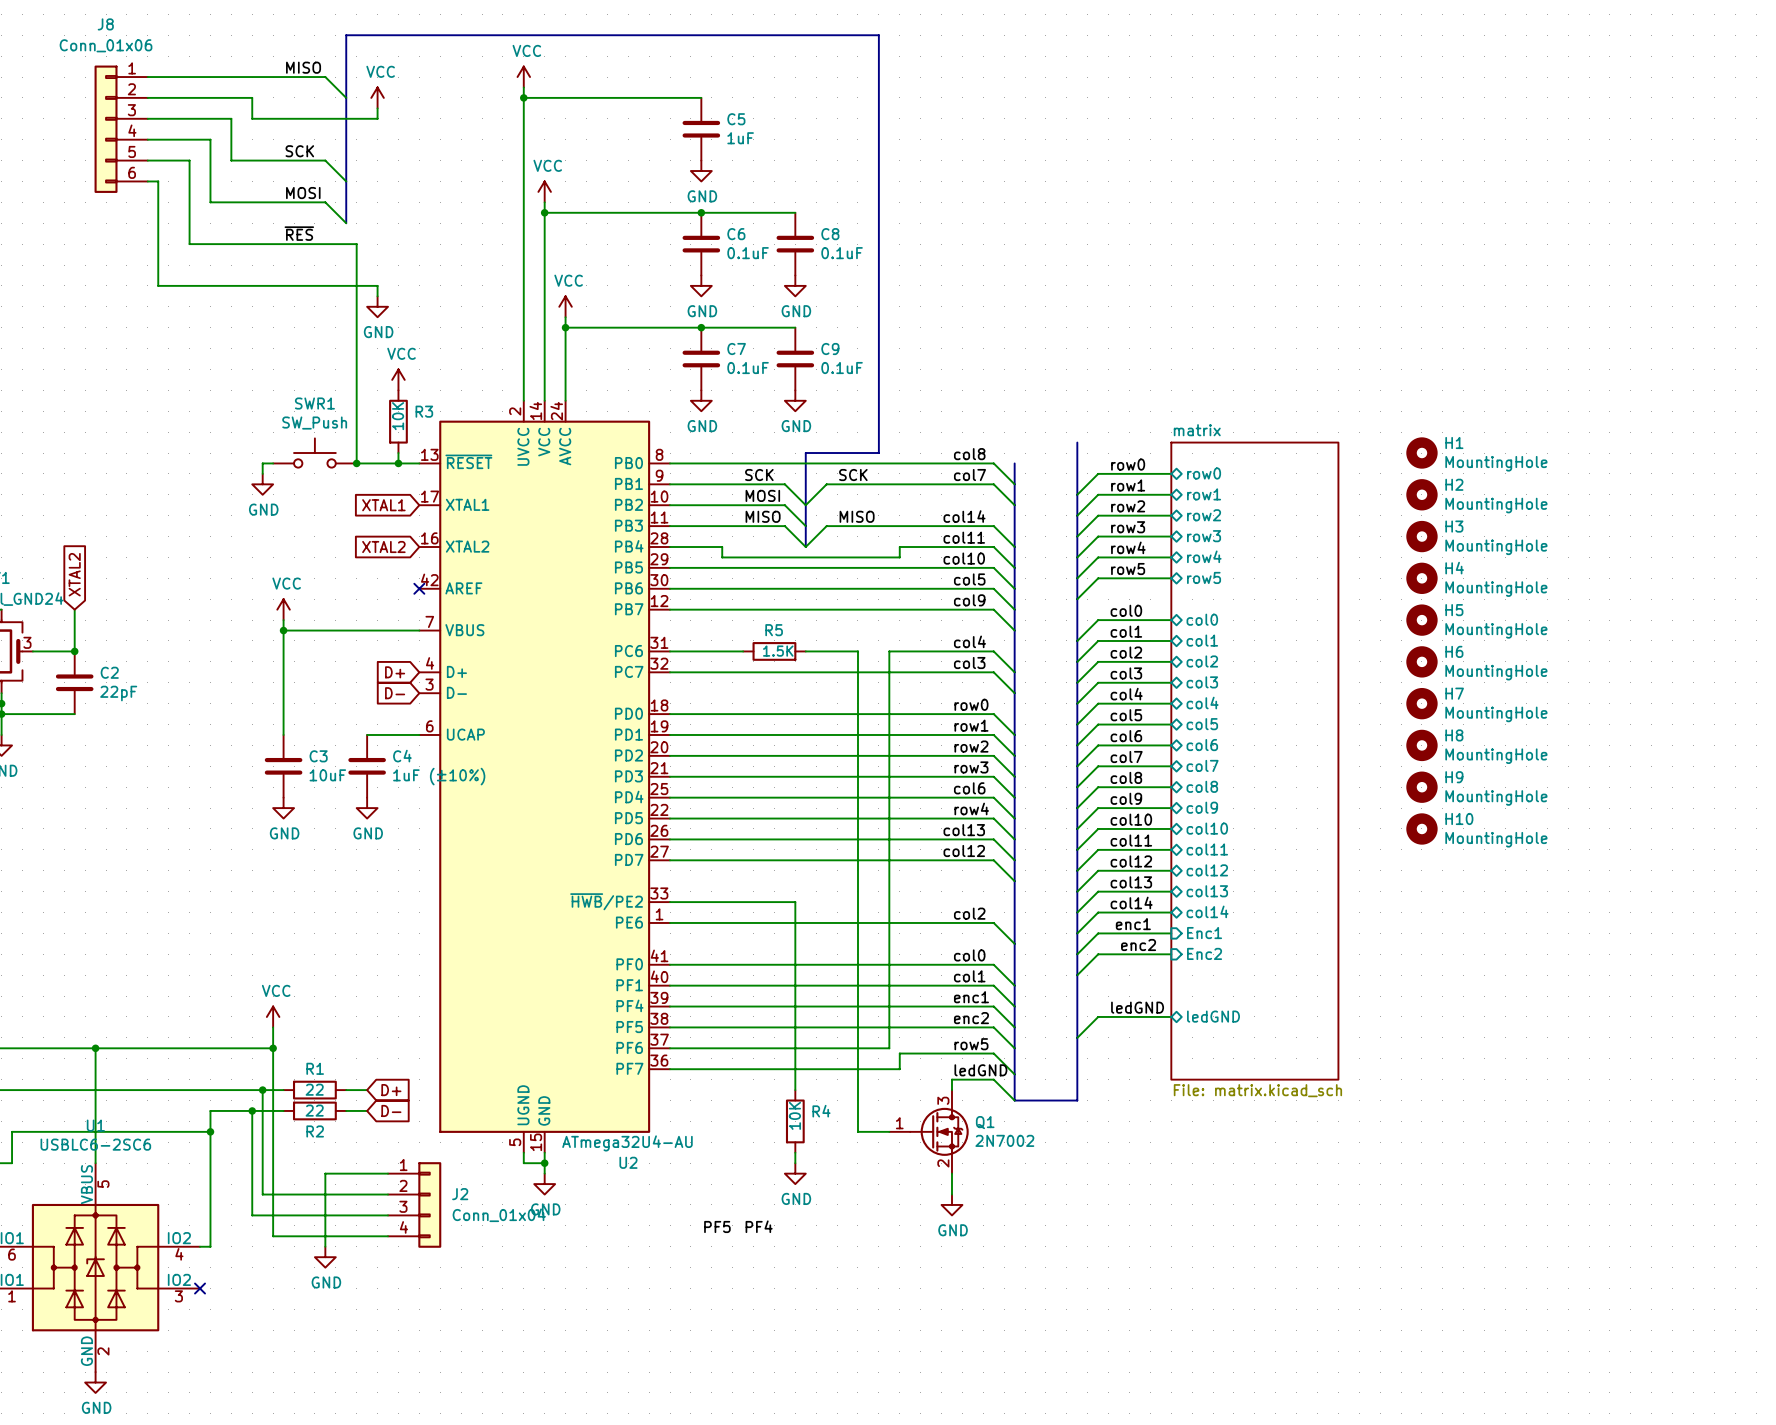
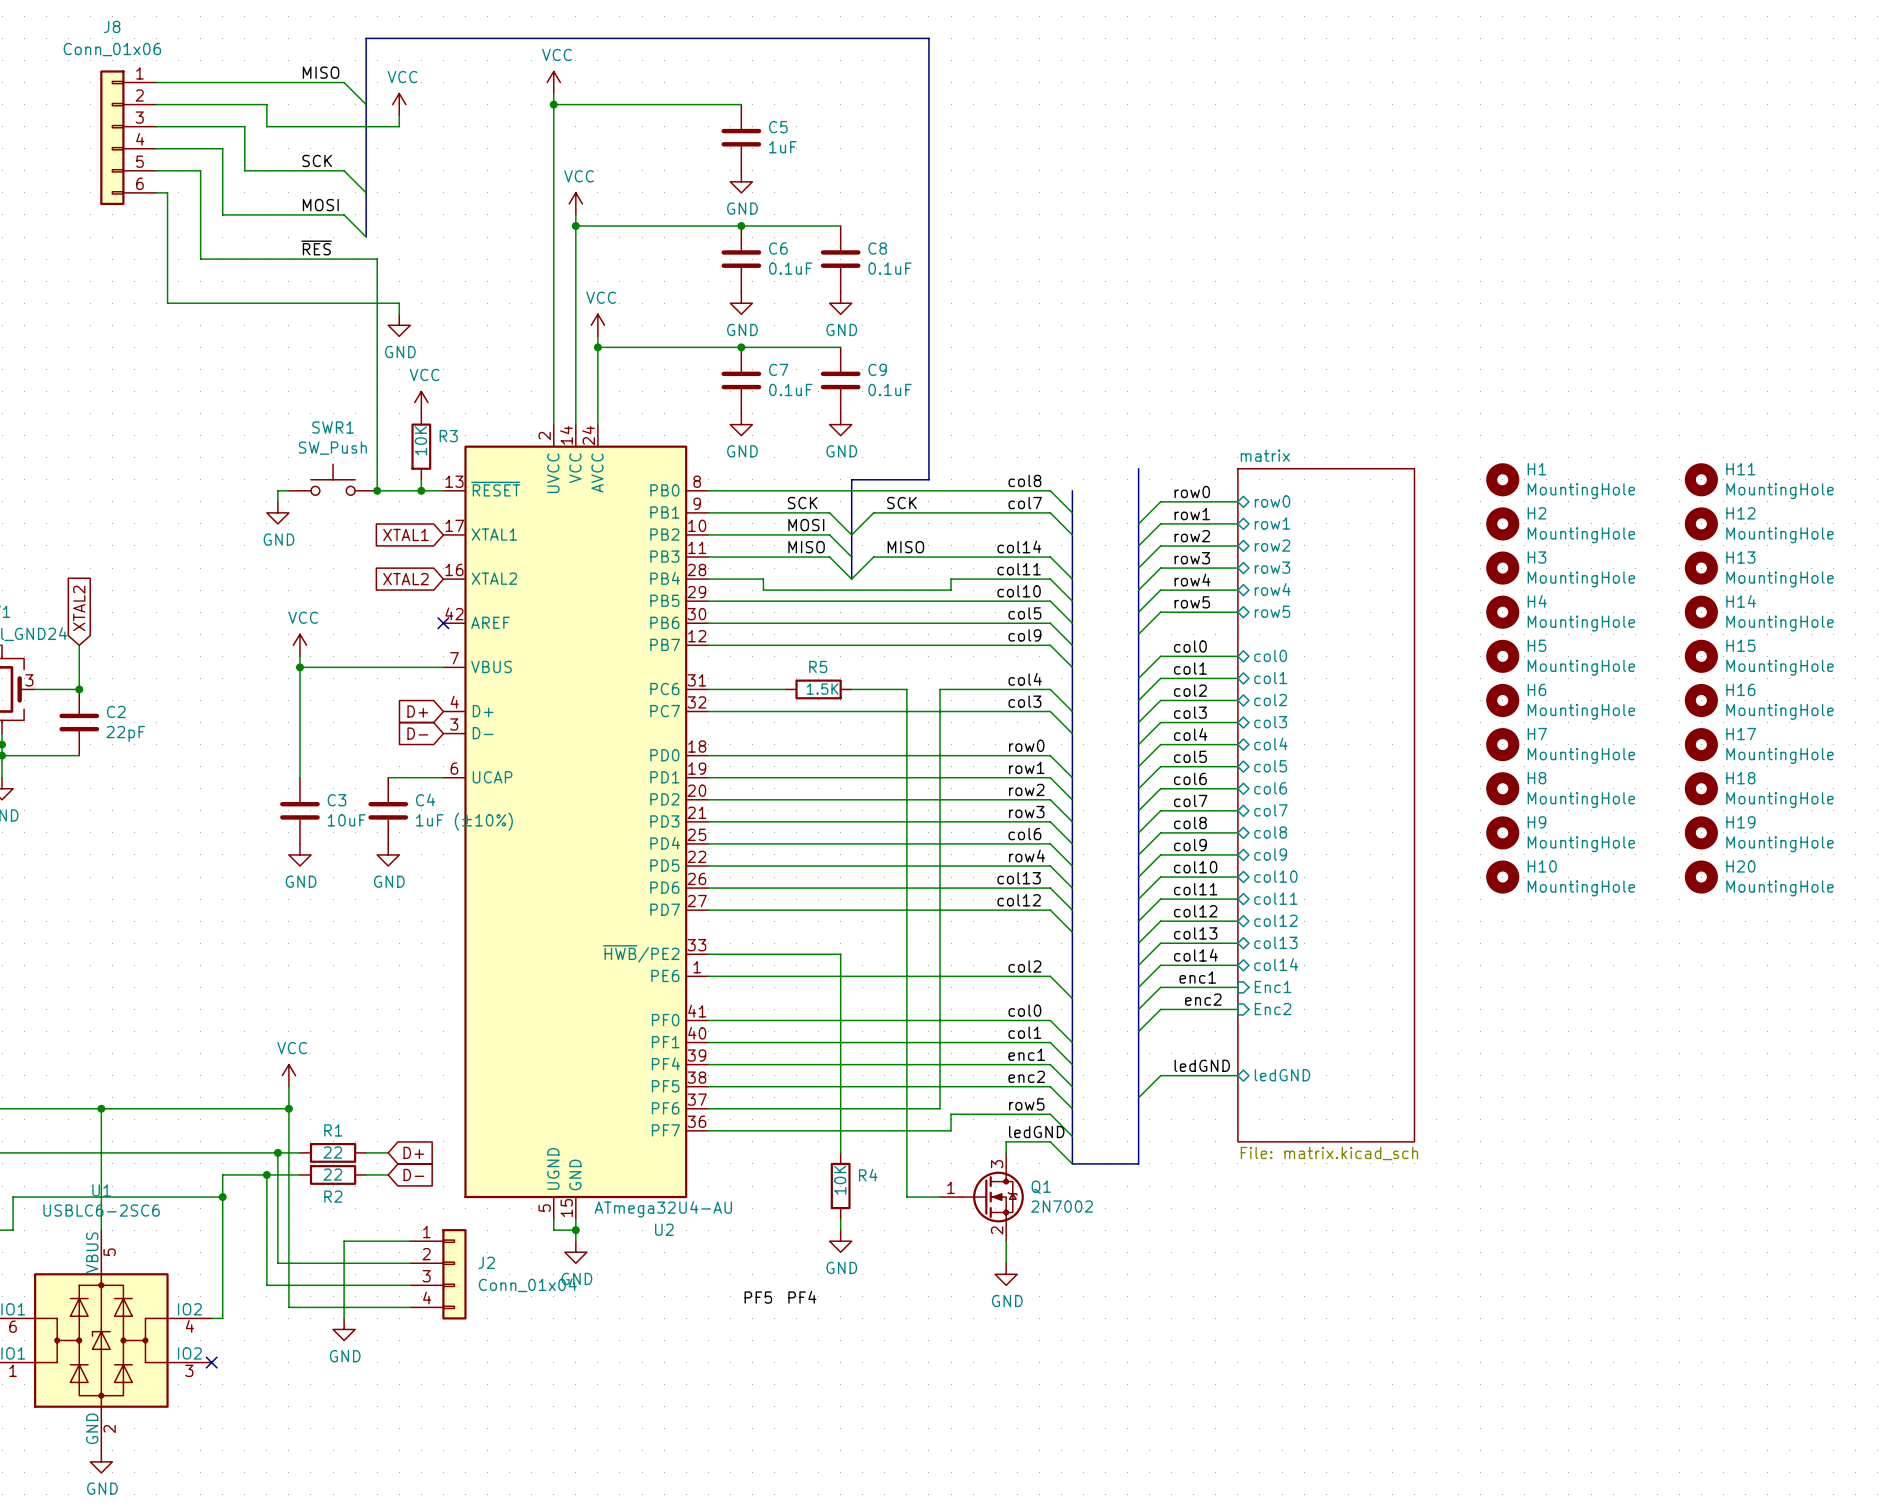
H11: none -> MountingHole (1701, 479)
H12: none -> MountingHole (1701, 523)
H13: none -> MountingHole (1701, 568)
H14: none -> MountingHole (1701, 612)
H15: none -> MountingHole (1701, 656)
H16: none -> MountingHole (1701, 700)
H17: none -> MountingHole (1701, 744)
H18: none -> MountingHole (1701, 788)
H19: none -> MountingHole (1701, 832)
H20: none -> MountingHole (1701, 877)

